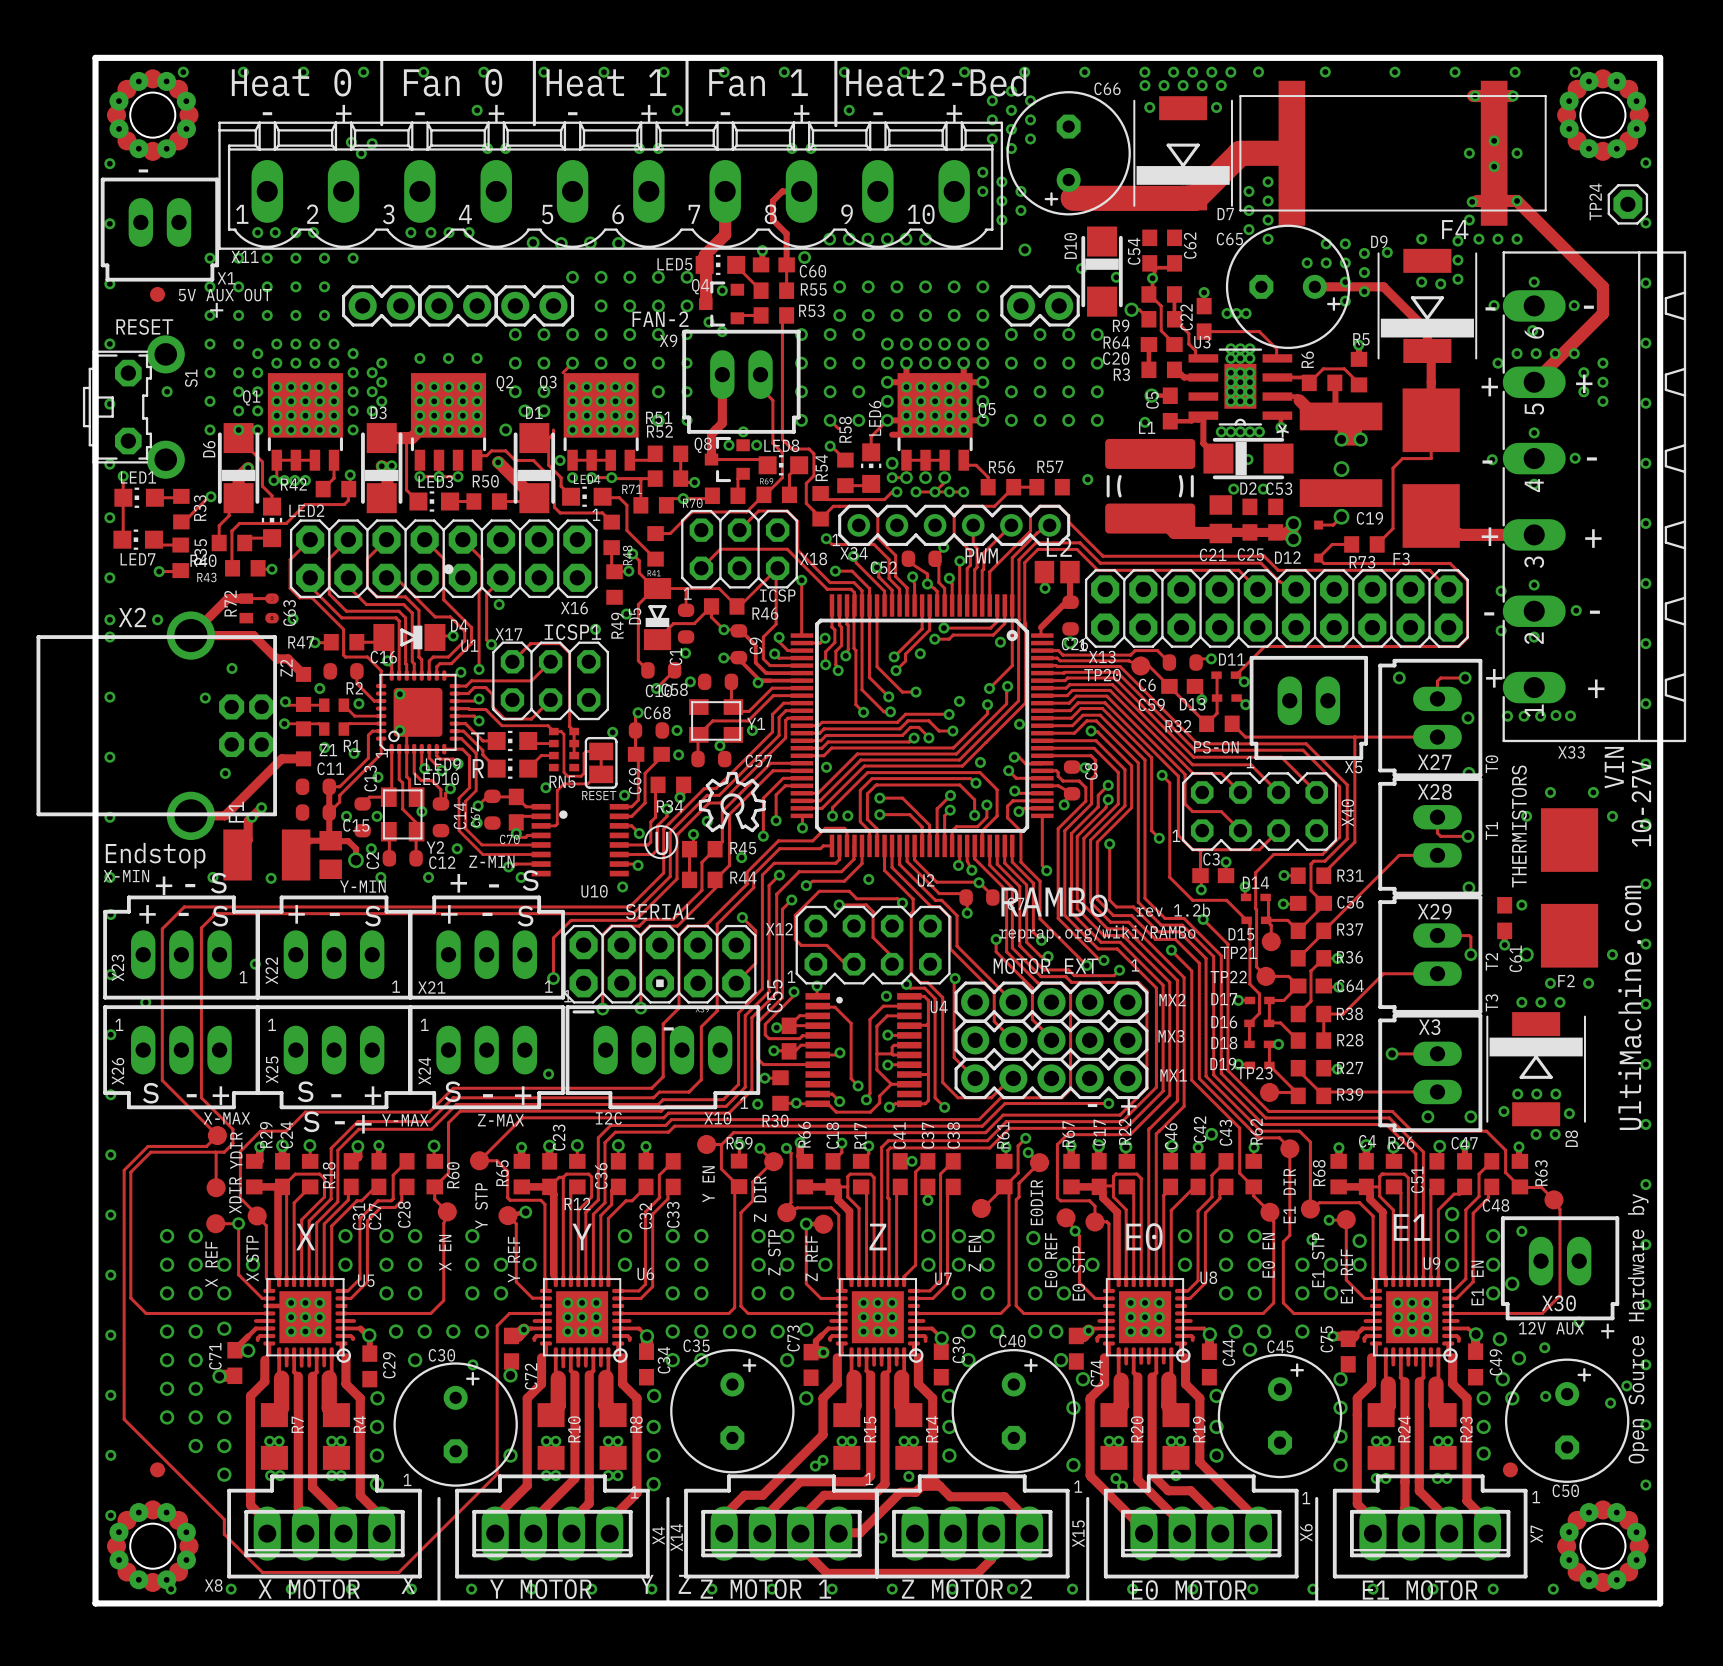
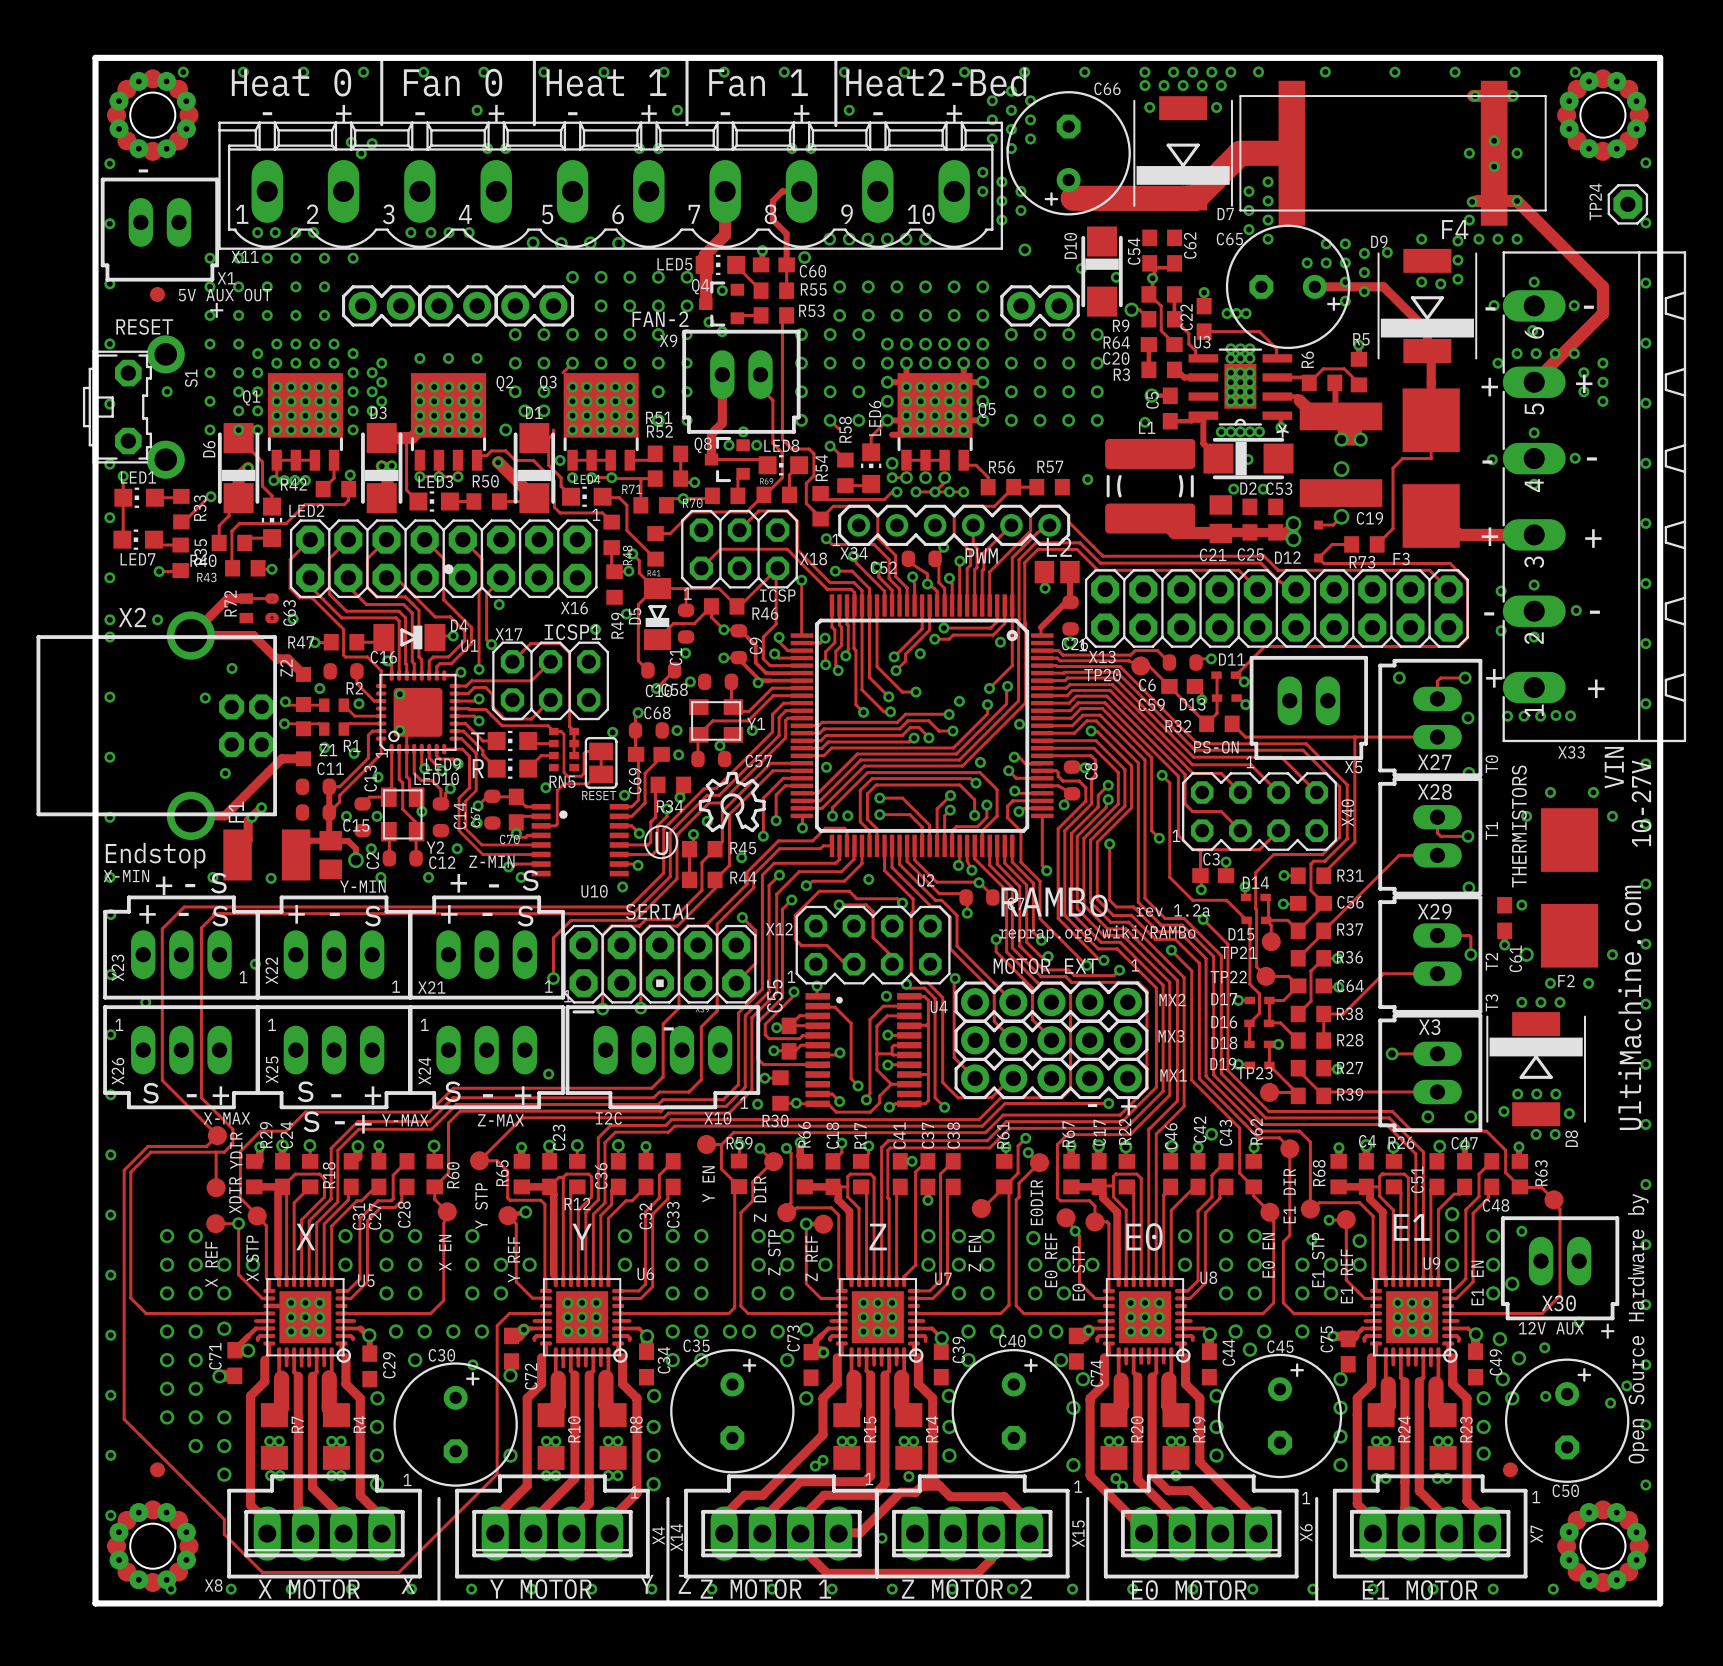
text: rev 1.2b (1173, 910) -> rev 1.2a (1173, 910)

